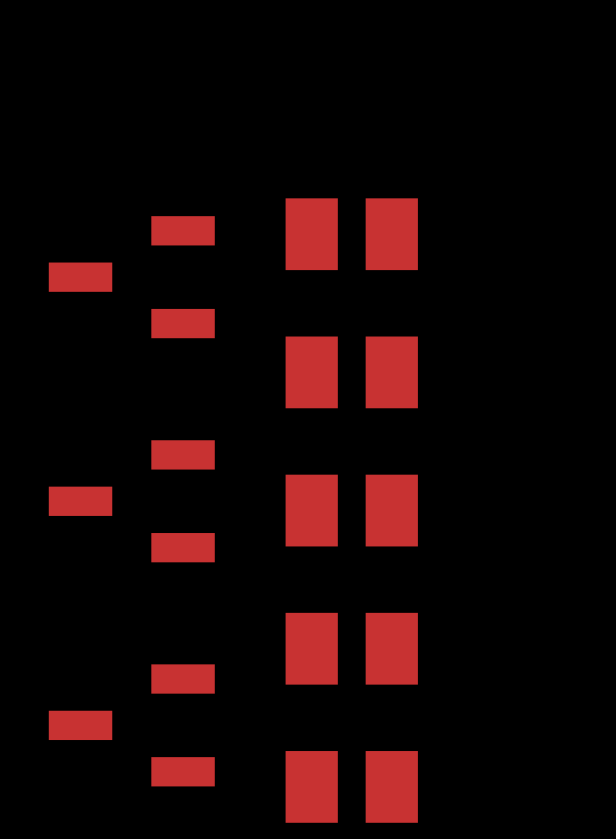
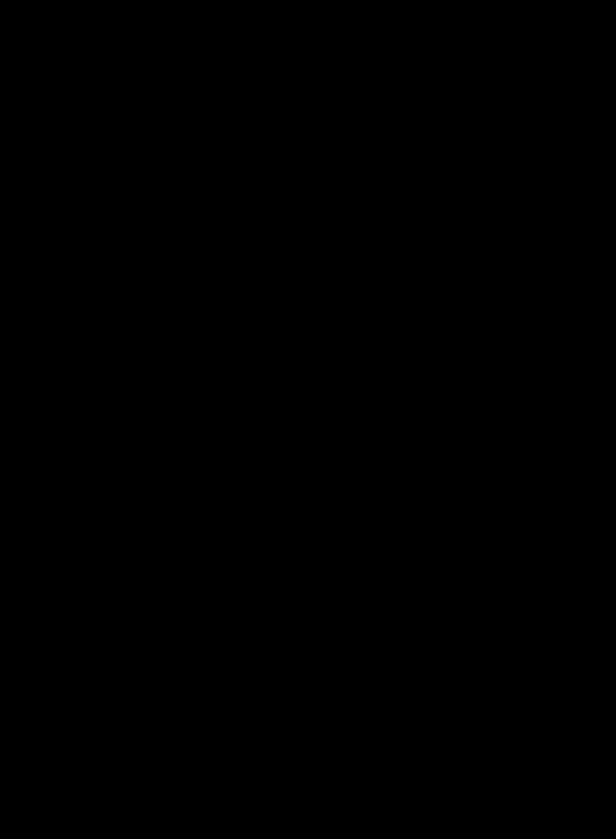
part: (351, 234) -> none
part: (131, 277) -> none
part: (351, 372) -> none
part: (131, 501) -> none
part: (351, 510) -> none
part: (351, 648) -> none
part: (131, 725) -> none
part: (351, 786) -> none

